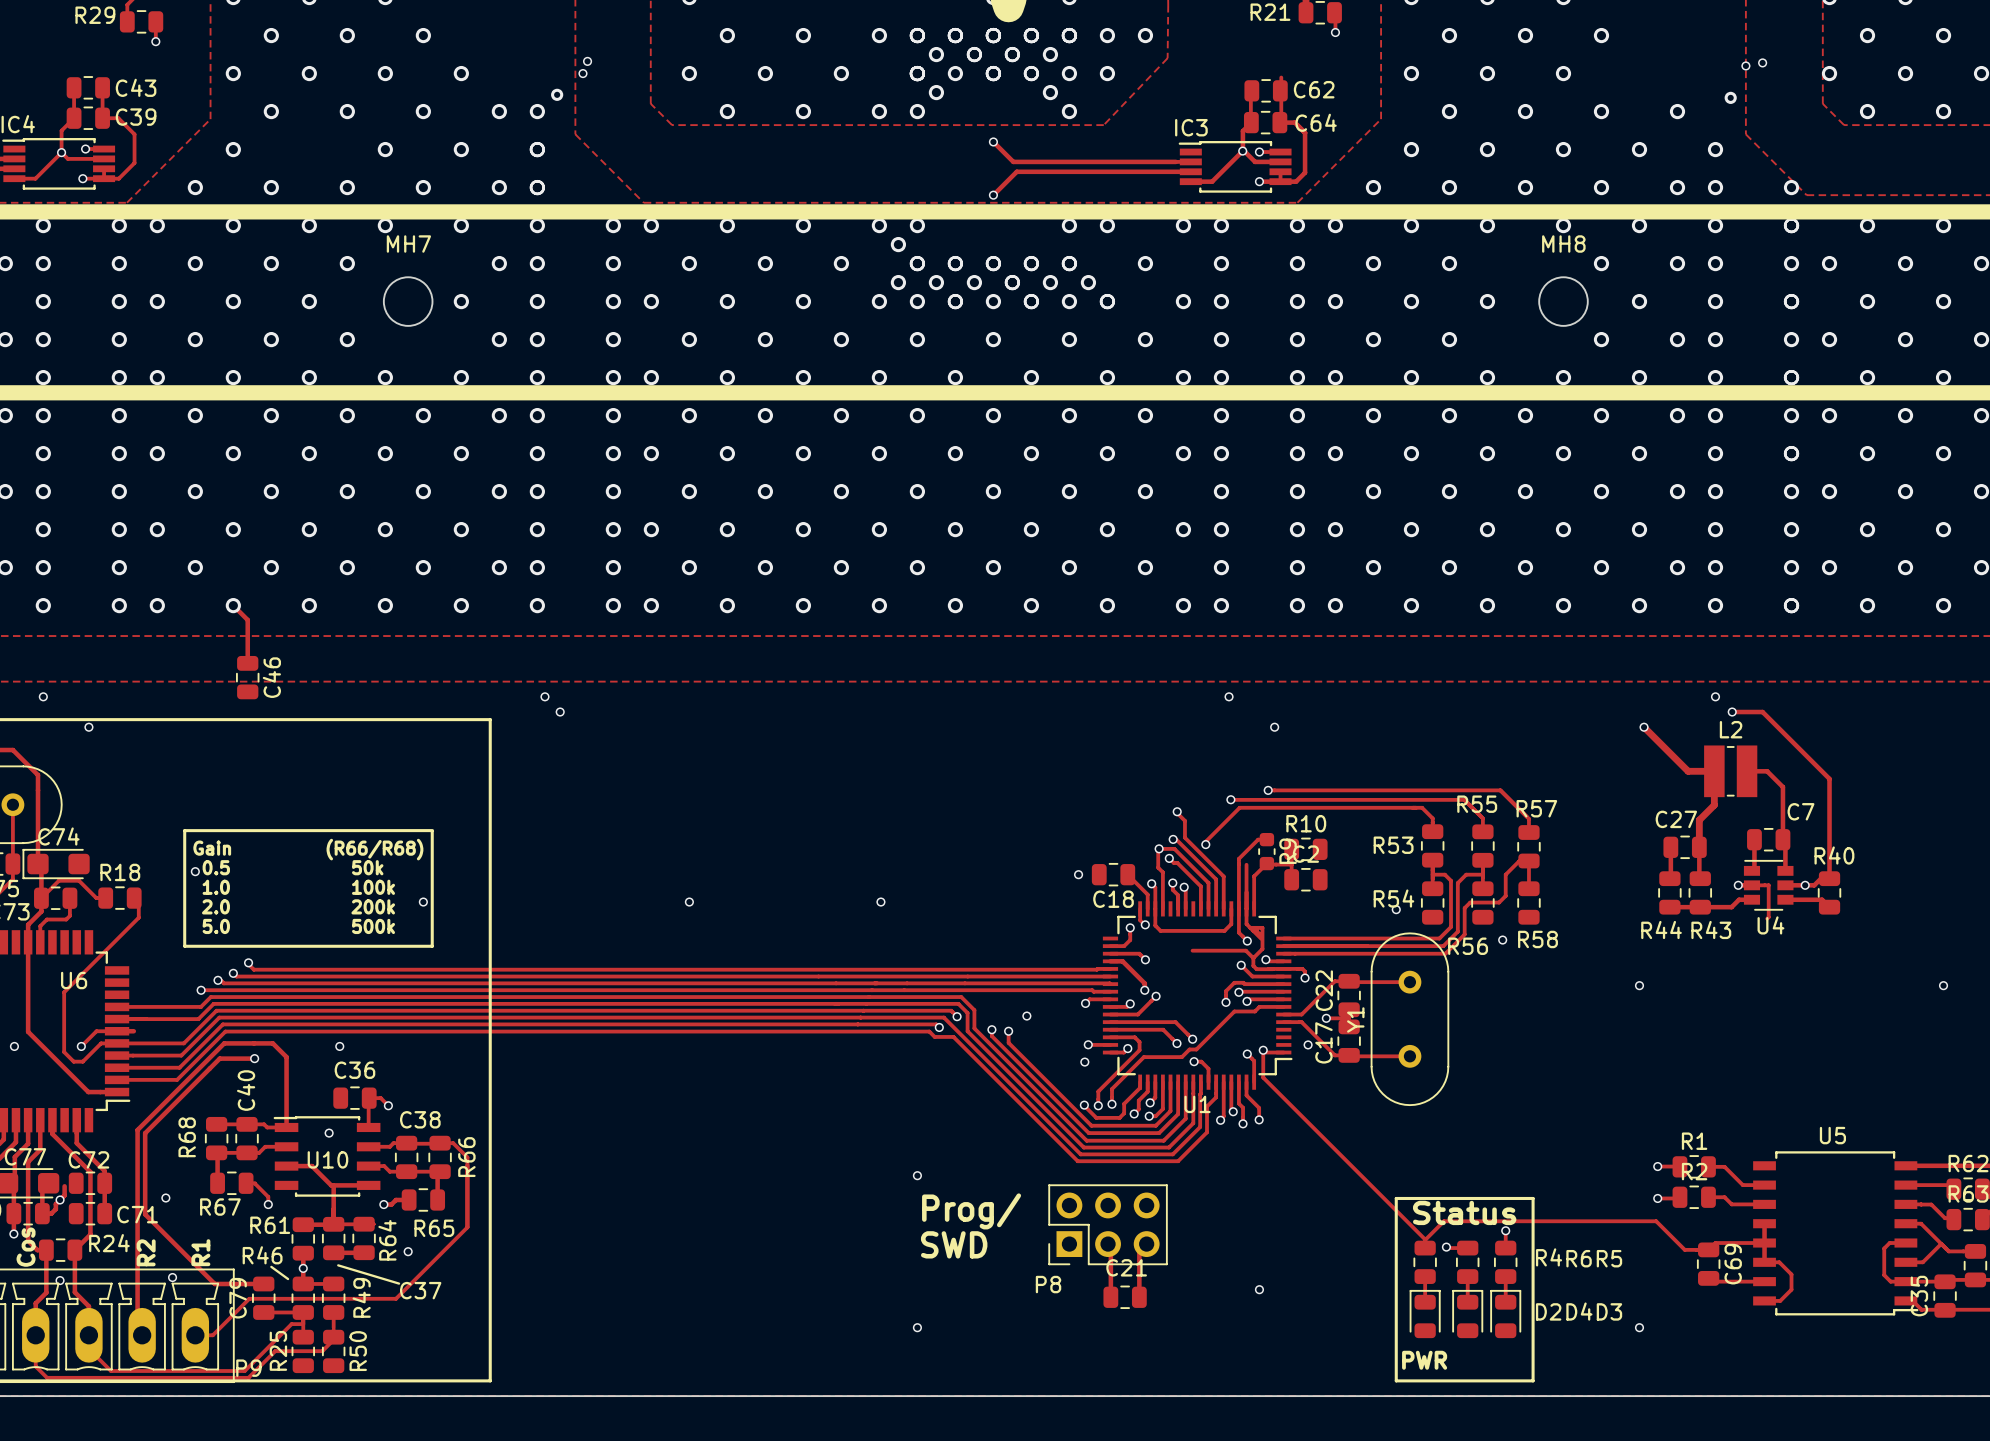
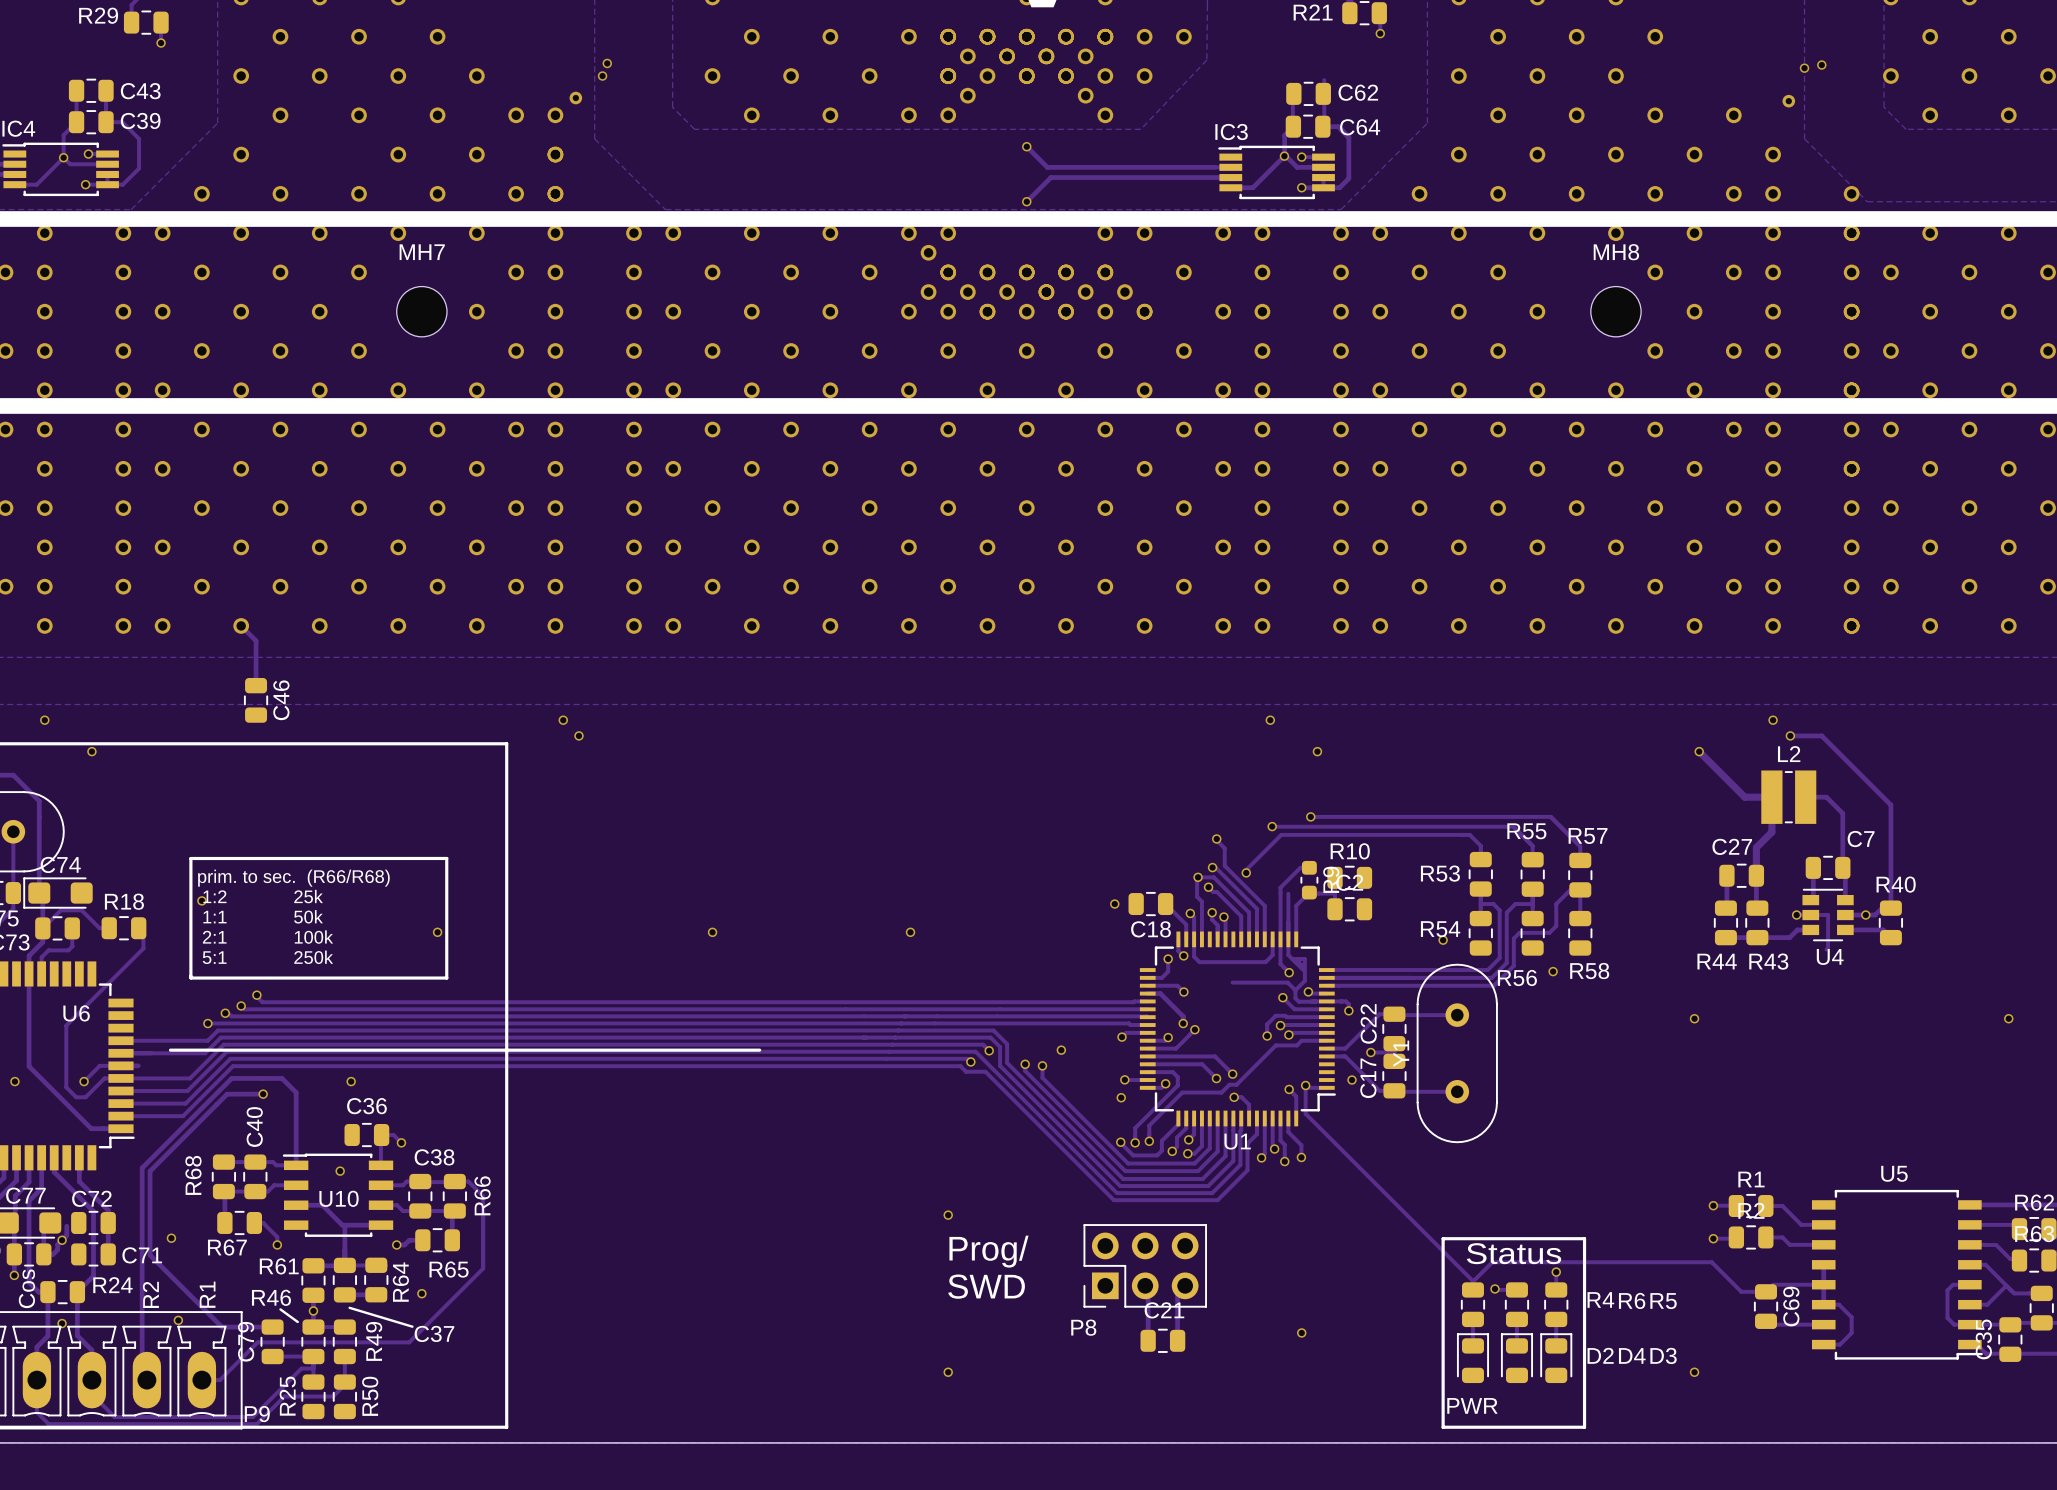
text: Gain (R66/R68) (308, 849) -> prim. to sec. (R66/R68) (293, 878)
text: 0.5 50k (293, 867) -> 1:2 25k (263, 896)
text: 1.0 100k (298, 887) -> 1:1 50k (263, 916)
text: 2.0 200k (298, 906) -> 2:1 100k (267, 937)
text: 5.0 500k (298, 926) -> 5:1 250k (267, 957)
line: none -> (170, 1050) (759, 1050)

